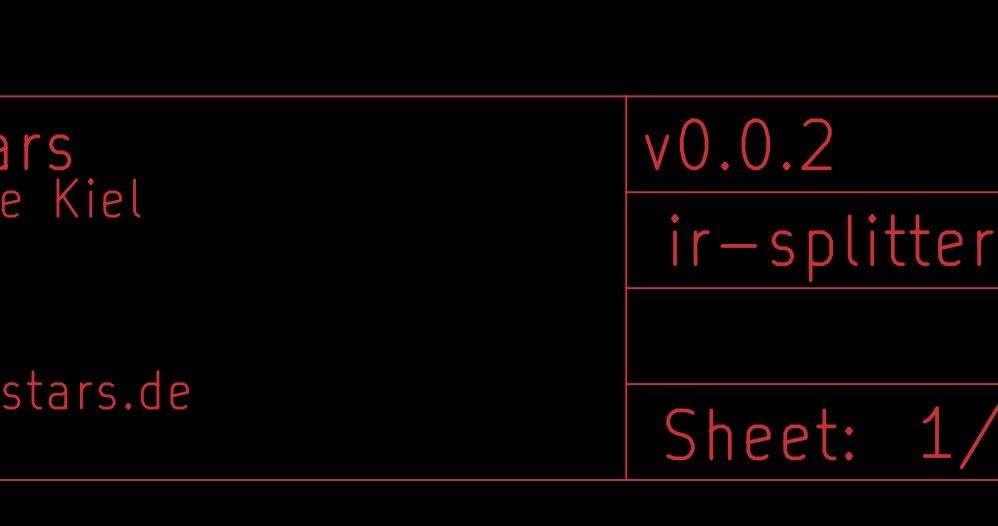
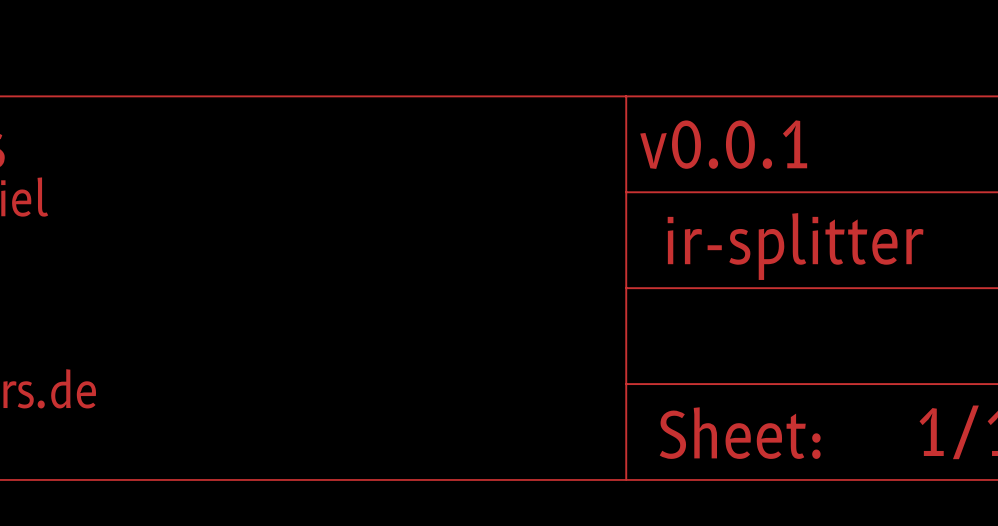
text: v0.0.2 (738, 144) -> v0.0.1 (723, 144)

